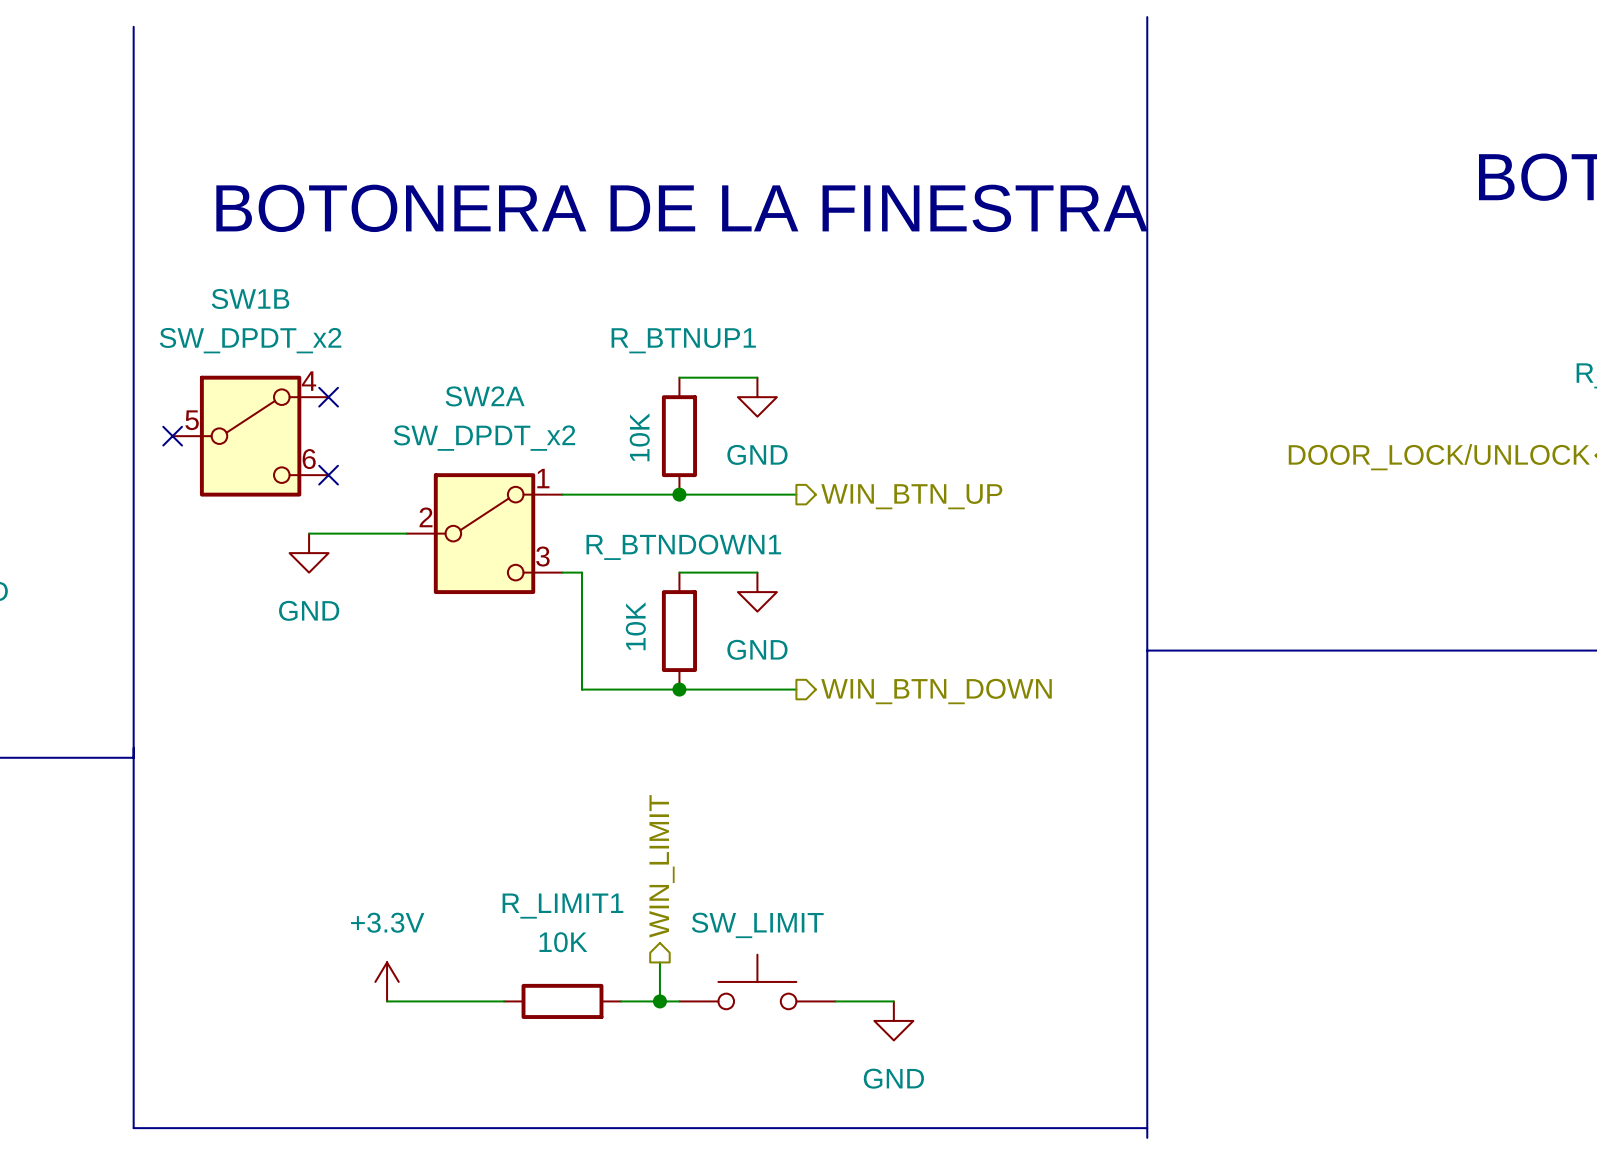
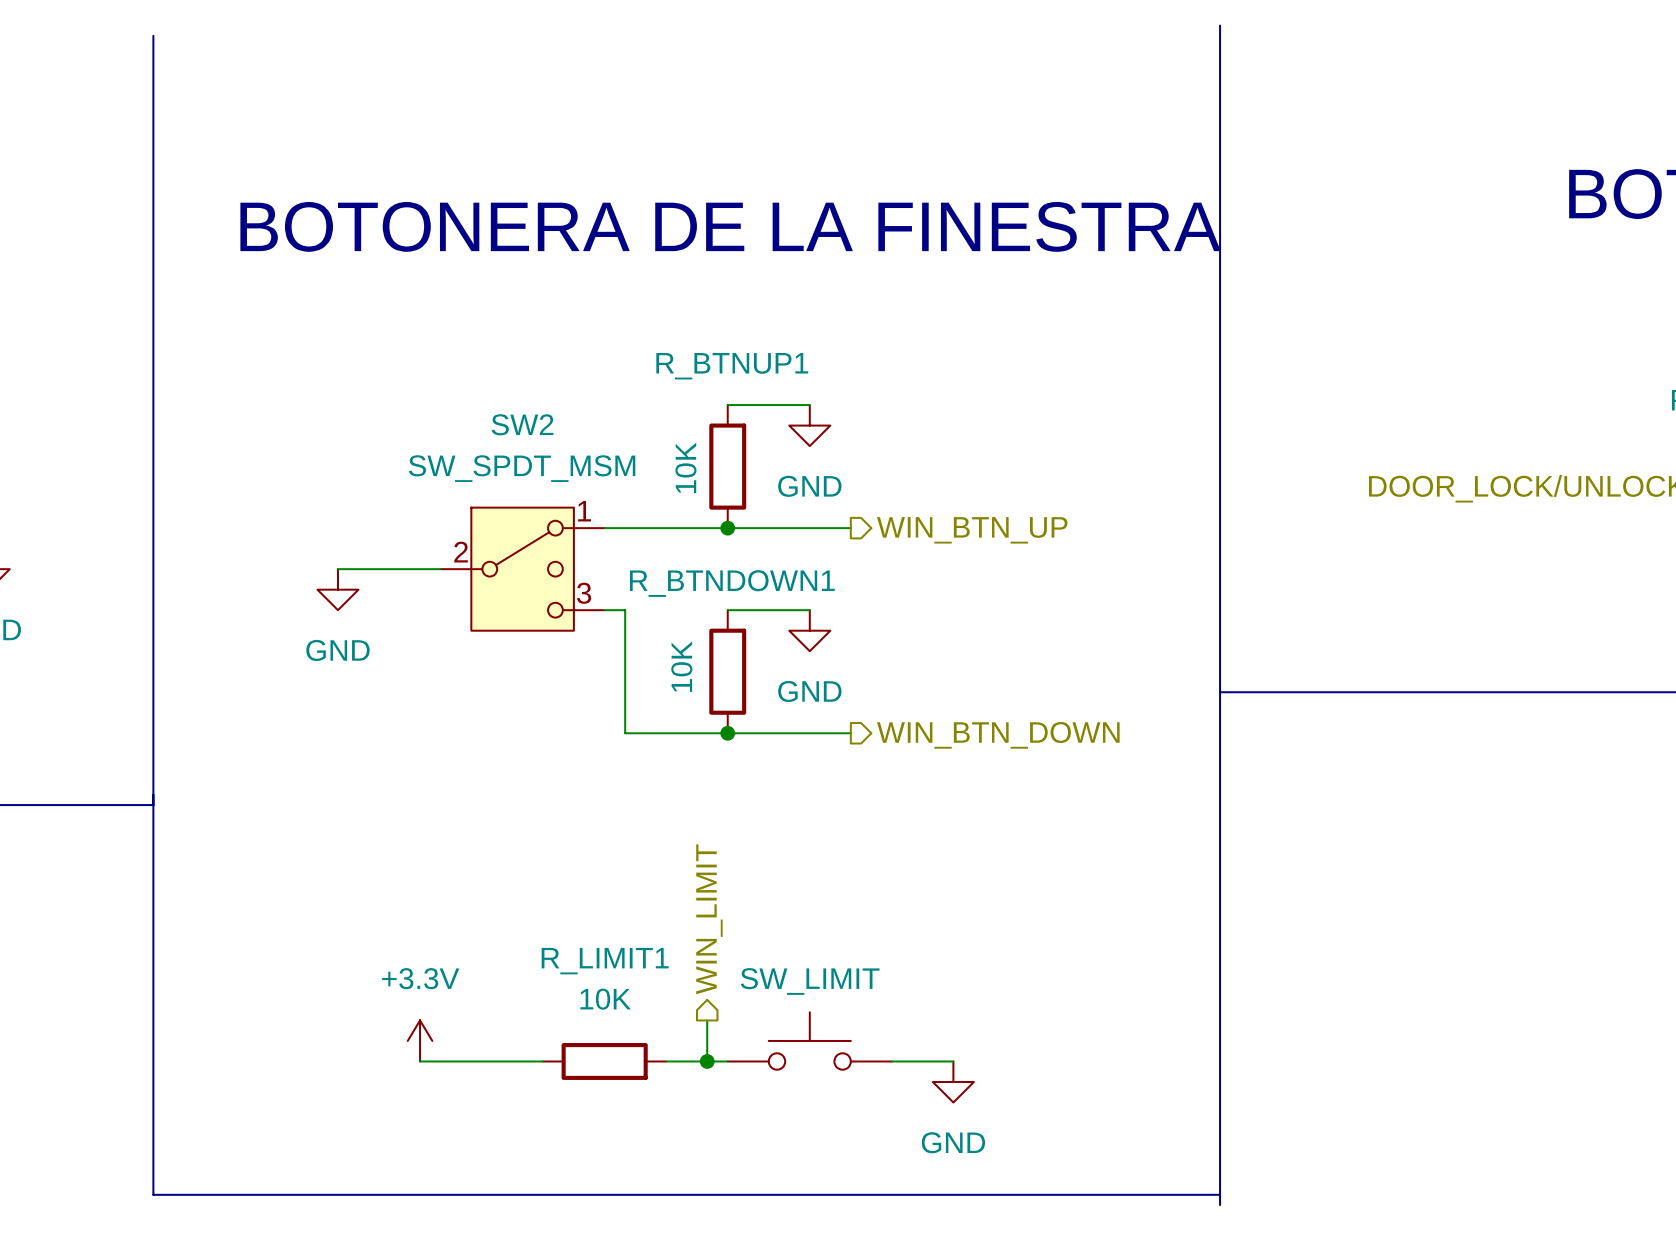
no-connect mark: (328, 397) -> none
no-connect mark: (172, 436) -> none
SW1B: SW_DPDT_x2 (250, 436) -> none
no-connect mark: (328, 475) -> none
SW2A: SW_DPDT_x2 (484, 533) -> none
SW2: none -> SW_SPDT_MSM (522, 569)

